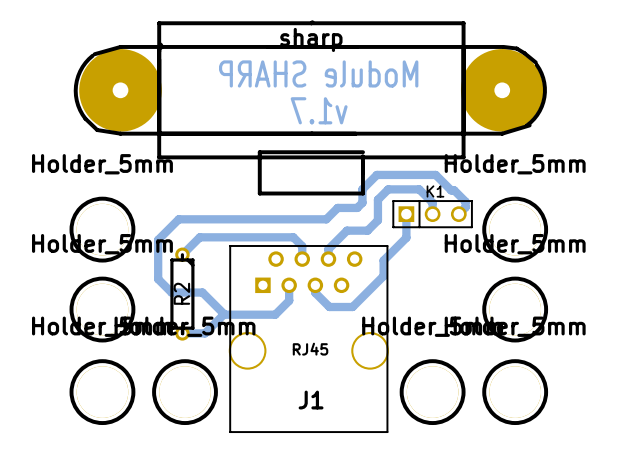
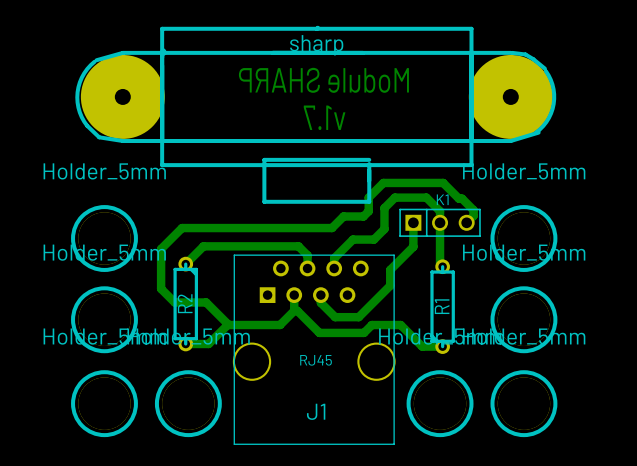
bottom track: none -> (440, 222) (440, 264) (442, 266)
R1: none -> (442, 306)
bottom track: none -> (294, 310) (297, 310) (319, 332) (363, 332) (371, 325) (400, 325) (422, 346) (442, 346)

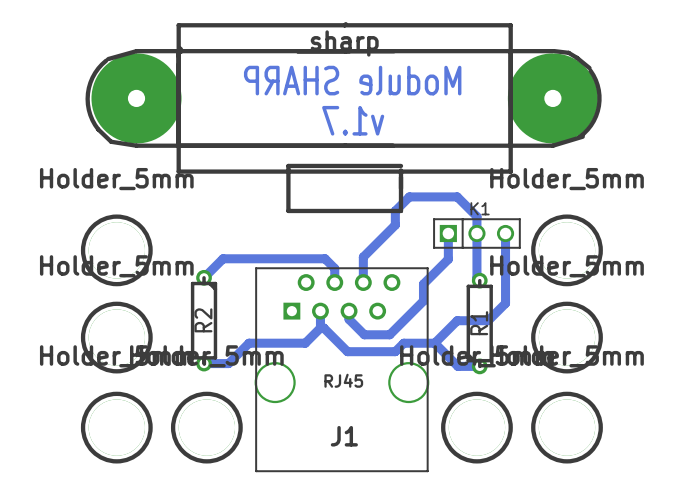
bottom track: (440, 211) (426, 197) (394, 197) (384, 208) (384, 229) (373, 239) (353, 239) (334, 258) -> (476, 221) (476, 216) (457, 196) (409, 196) (395, 210) (395, 225) (363, 257) (363, 271)
bottom track: (466, 222) (473, 215) (473, 210) (443, 182) (383, 182) (368, 197) (368, 211) (363, 216) (343, 216) (332, 228) (182, 228) (161, 249) (161, 288) (174, 302) (206, 302) (227, 325) -> (505, 233) (505, 303) (488, 320) (457, 320) (434, 343)

